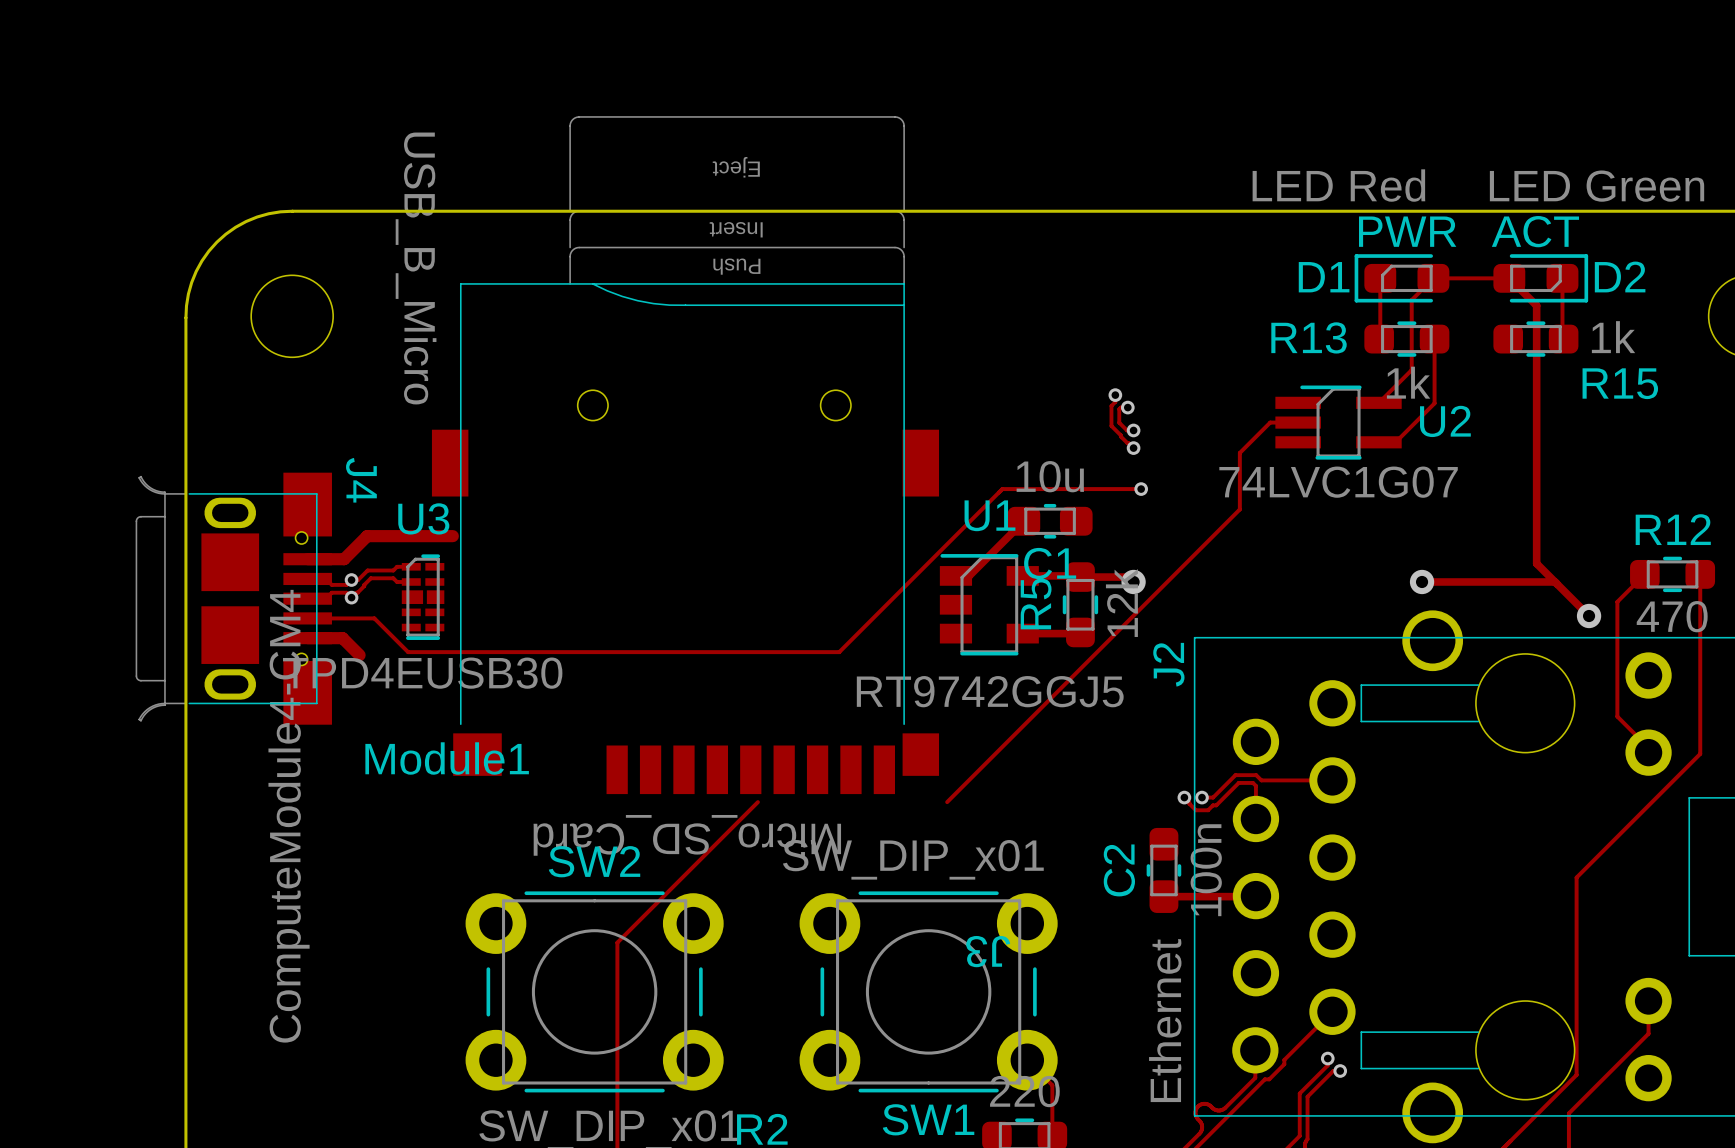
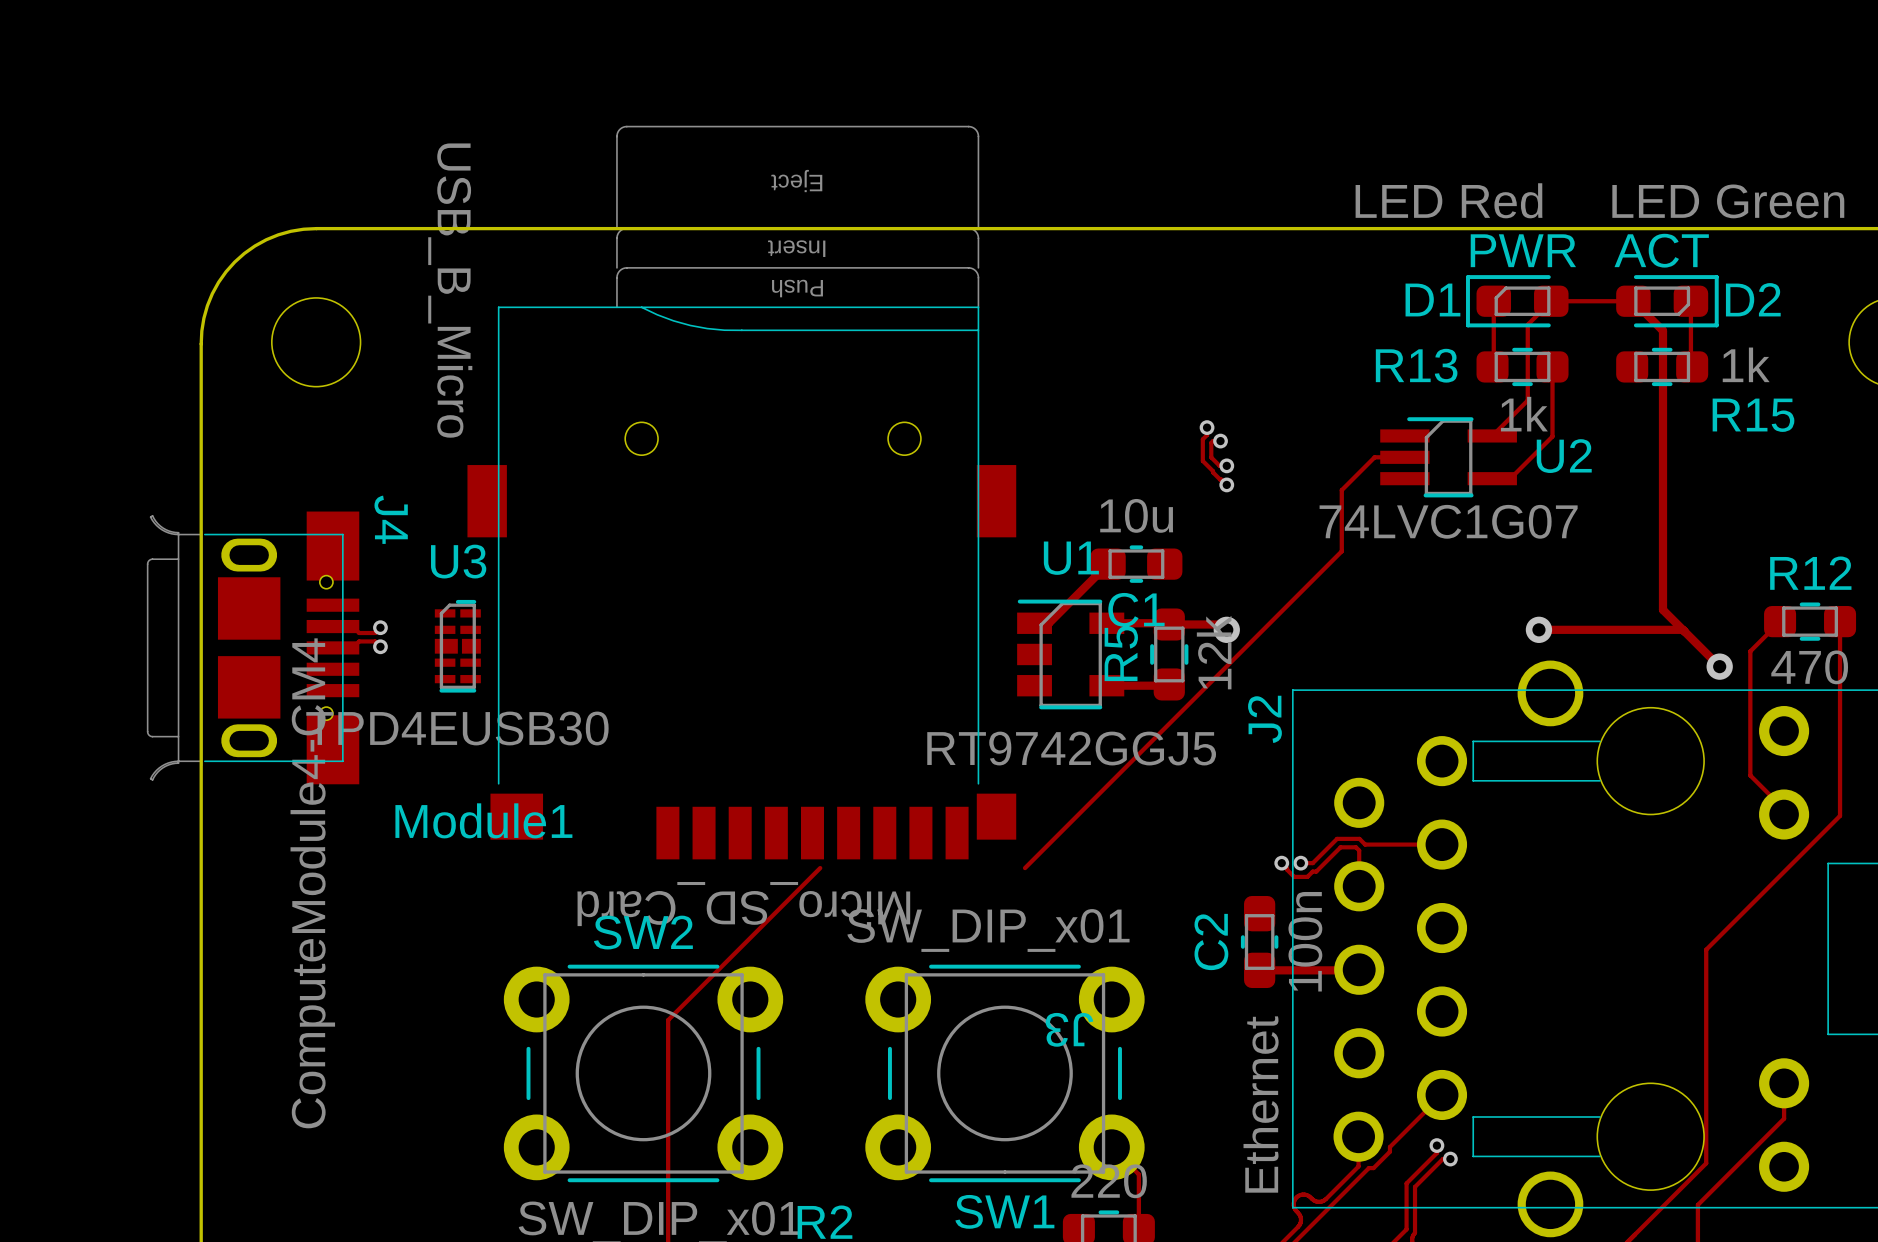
track: (1141, 489) (1002, 489) (839, 652) (408, 652) (374, 618) (307, 618) -> none
via: (1141, 489) -> none
track: (452, 536) (367, 536) (344, 559) (307, 559) -> none
track: (411, 566) (397, 566) (393, 570) (367, 570) (358, 580) (351, 580) -> none
track: (411, 581) (397, 581) (393, 578) (370, 578) (351, 597) -> none
track: (307, 638) (342, 638) (359, 655) -> none

